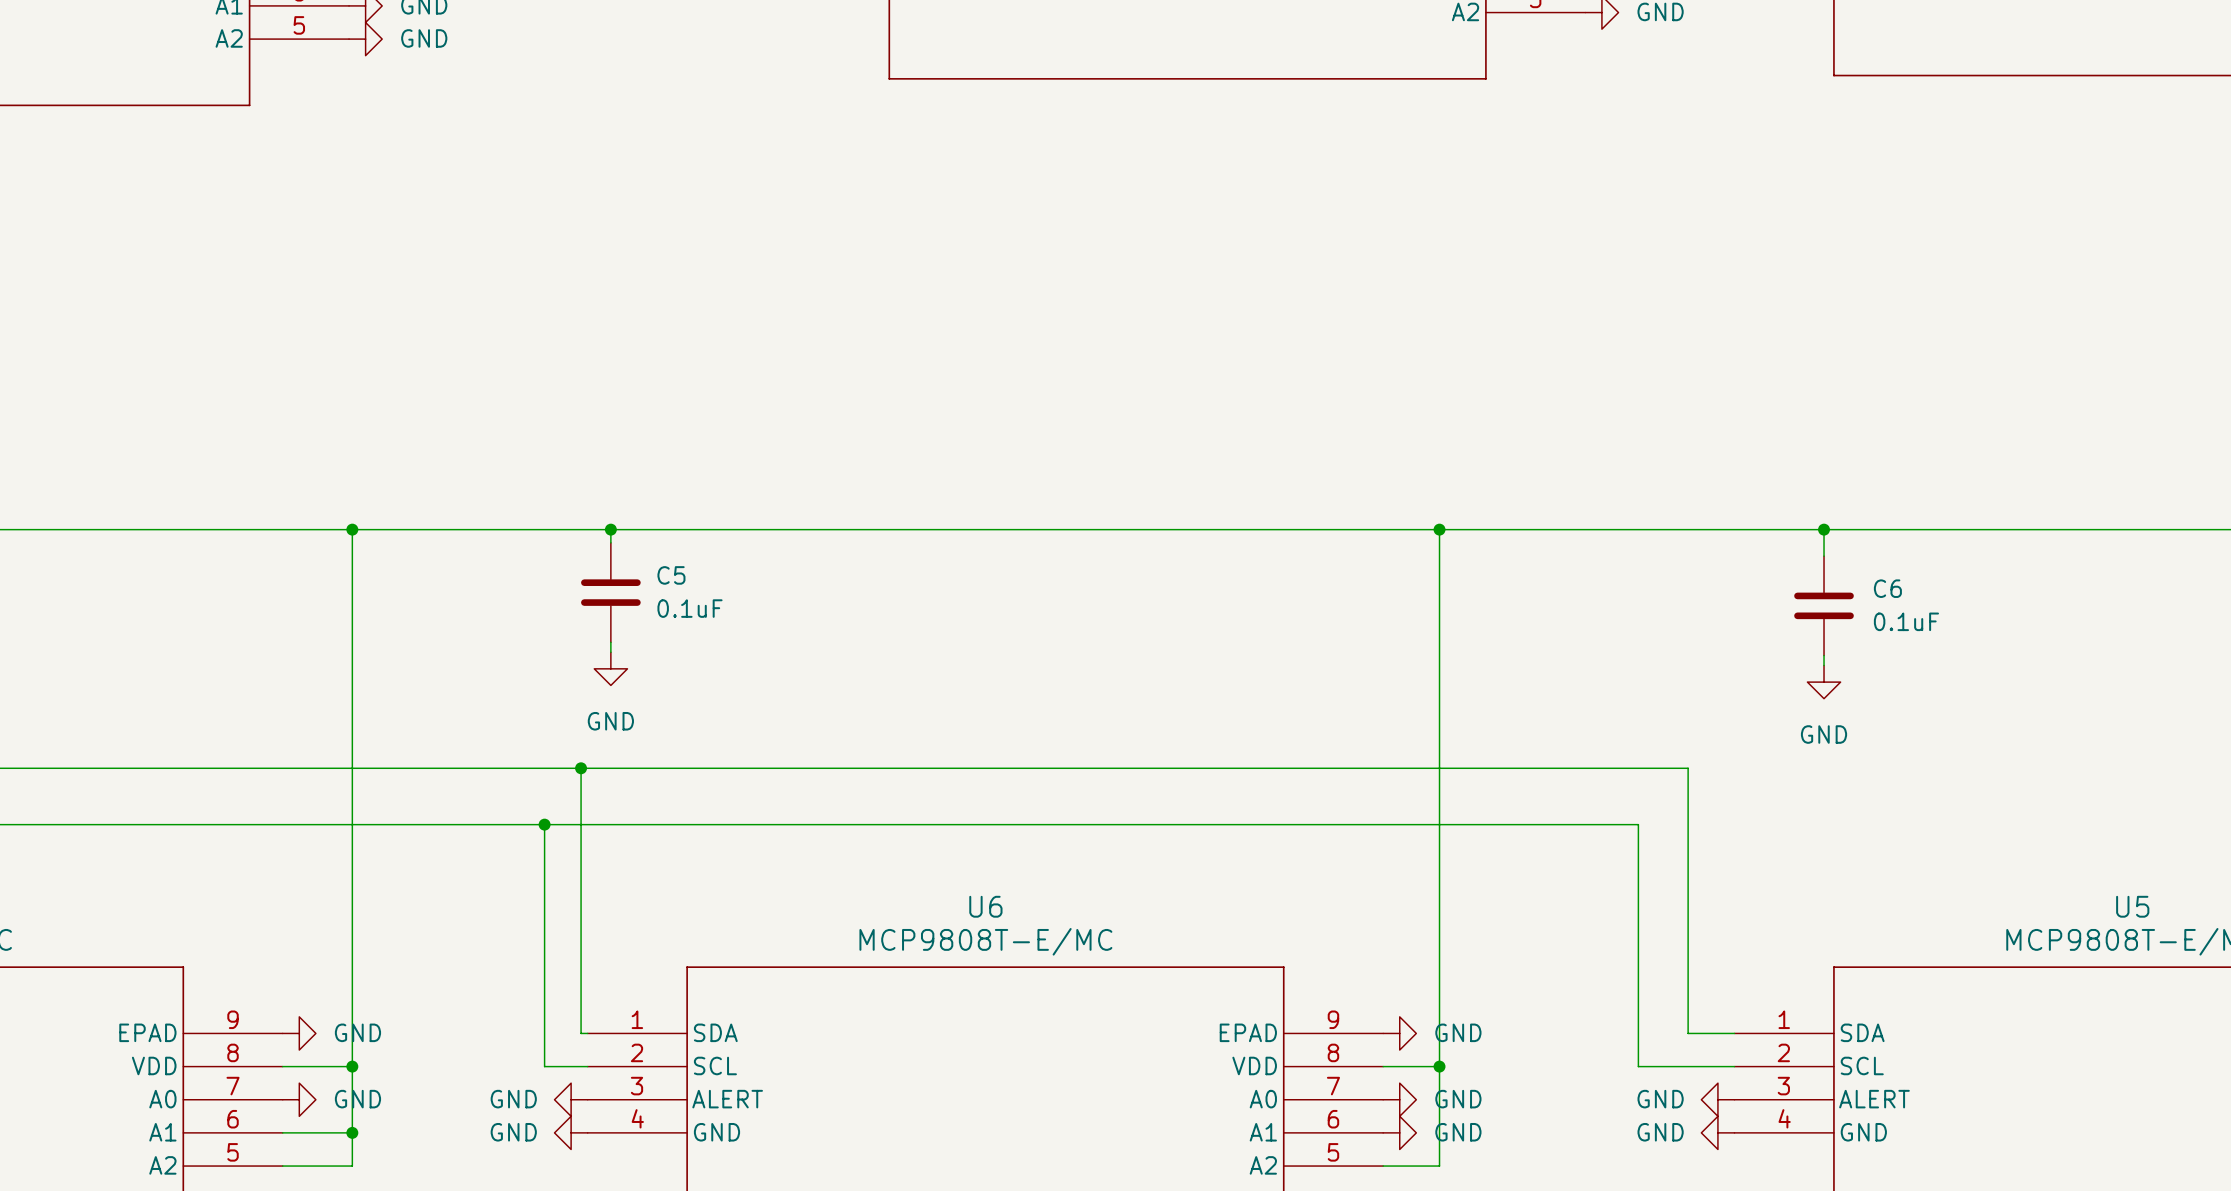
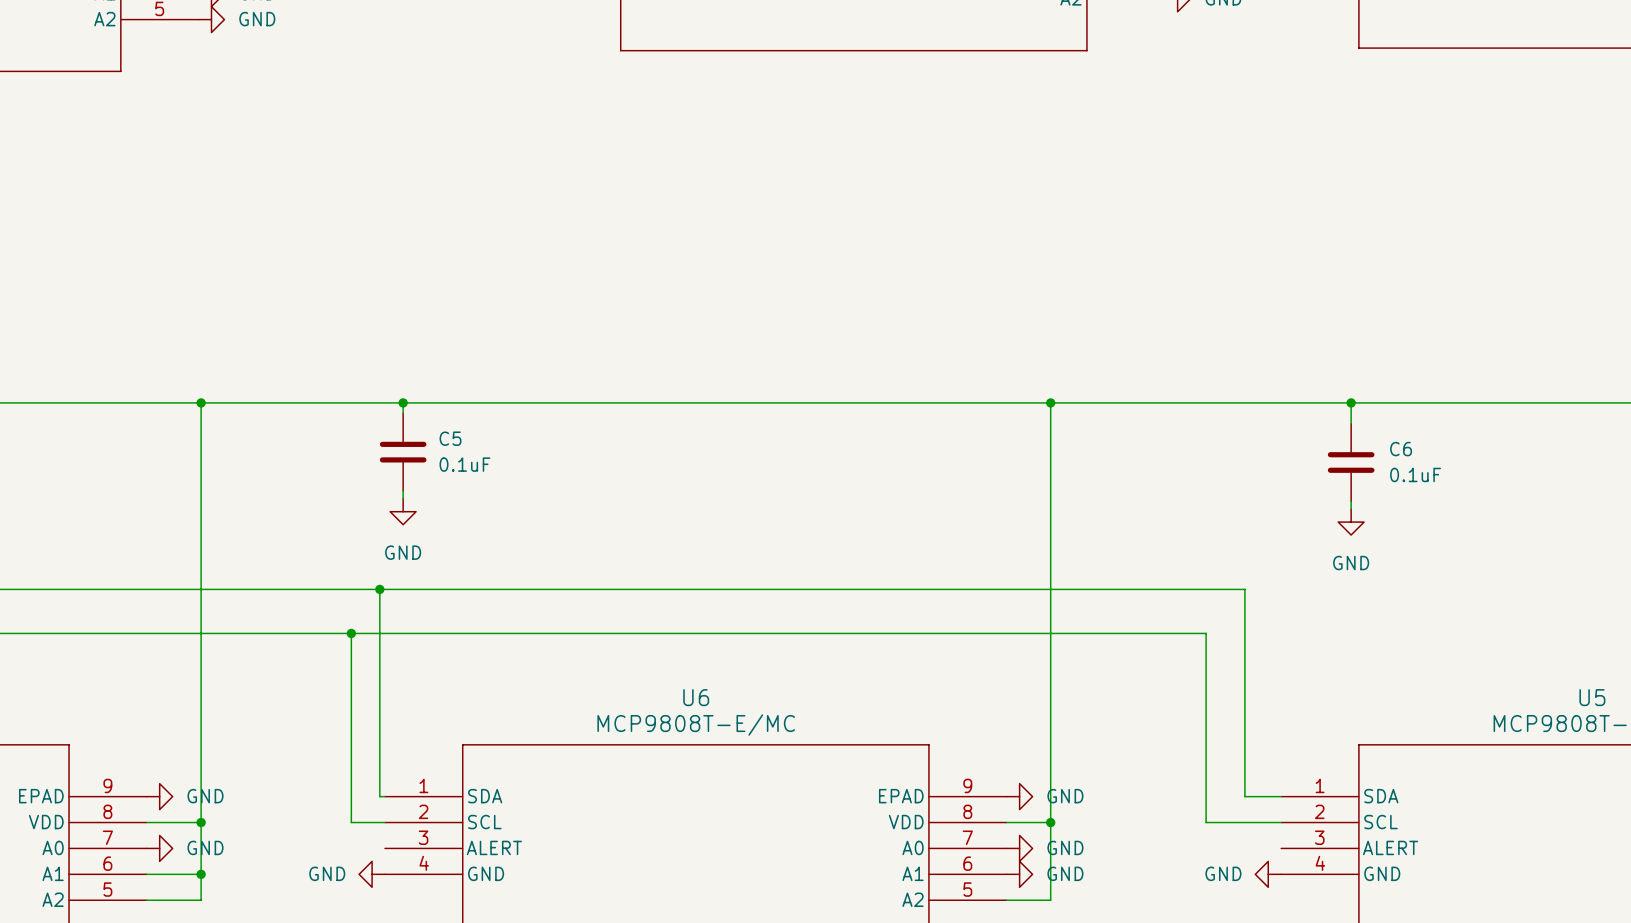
power symbol: GND (571, 1099) -> none
power symbol: GND (1717, 1099) -> none

